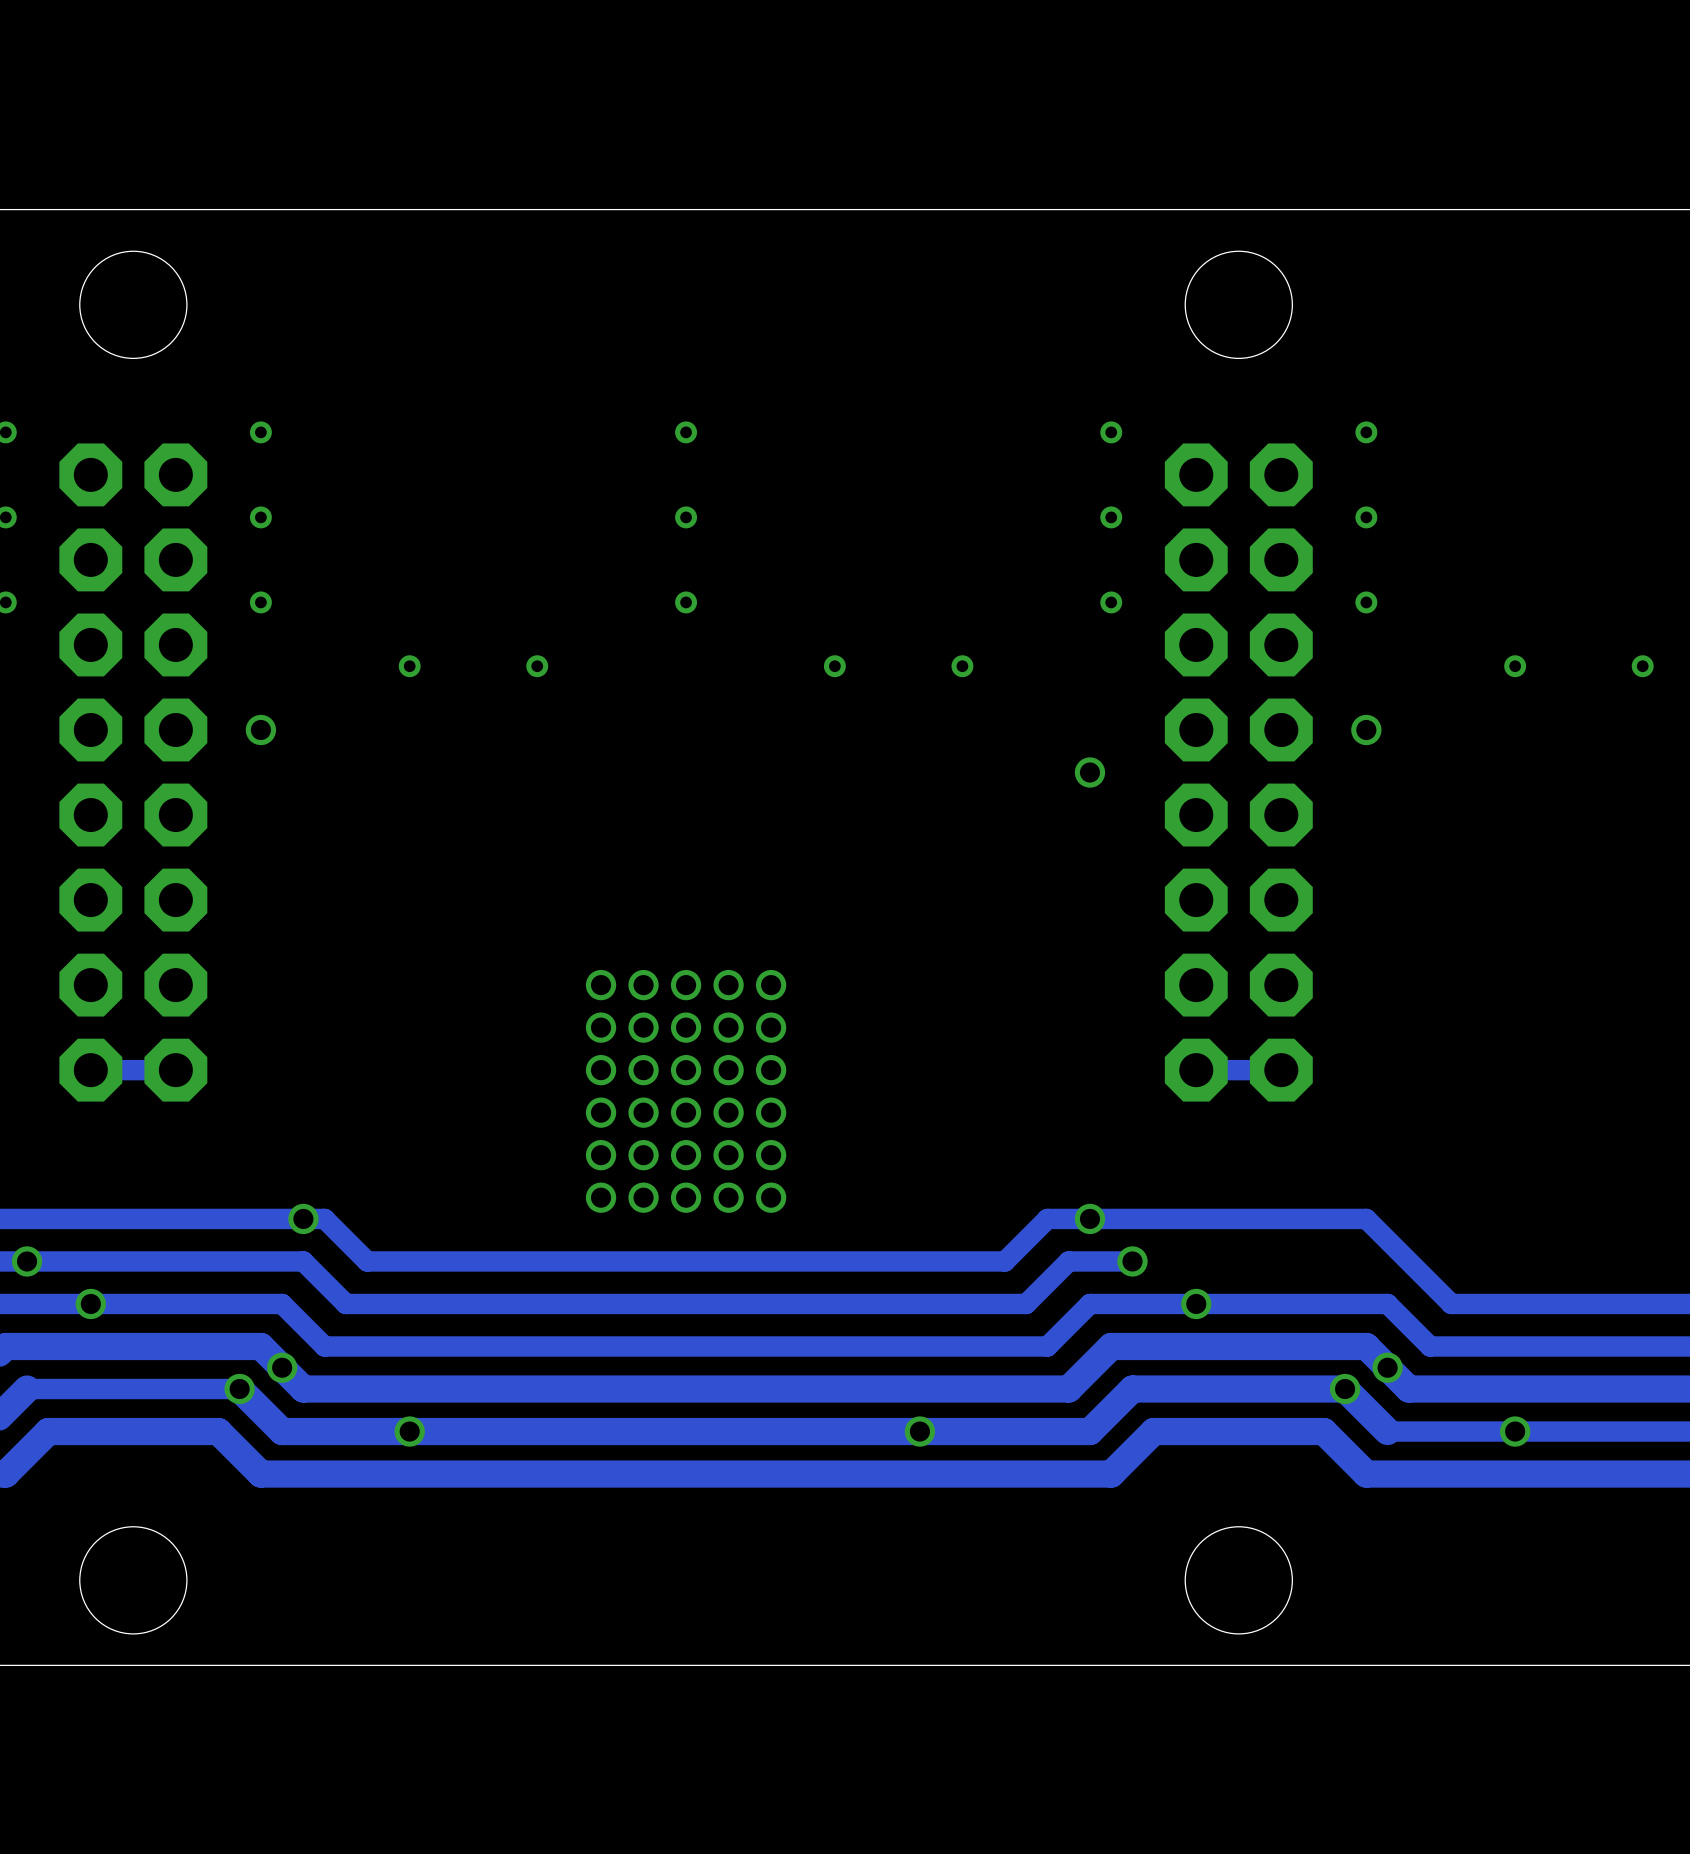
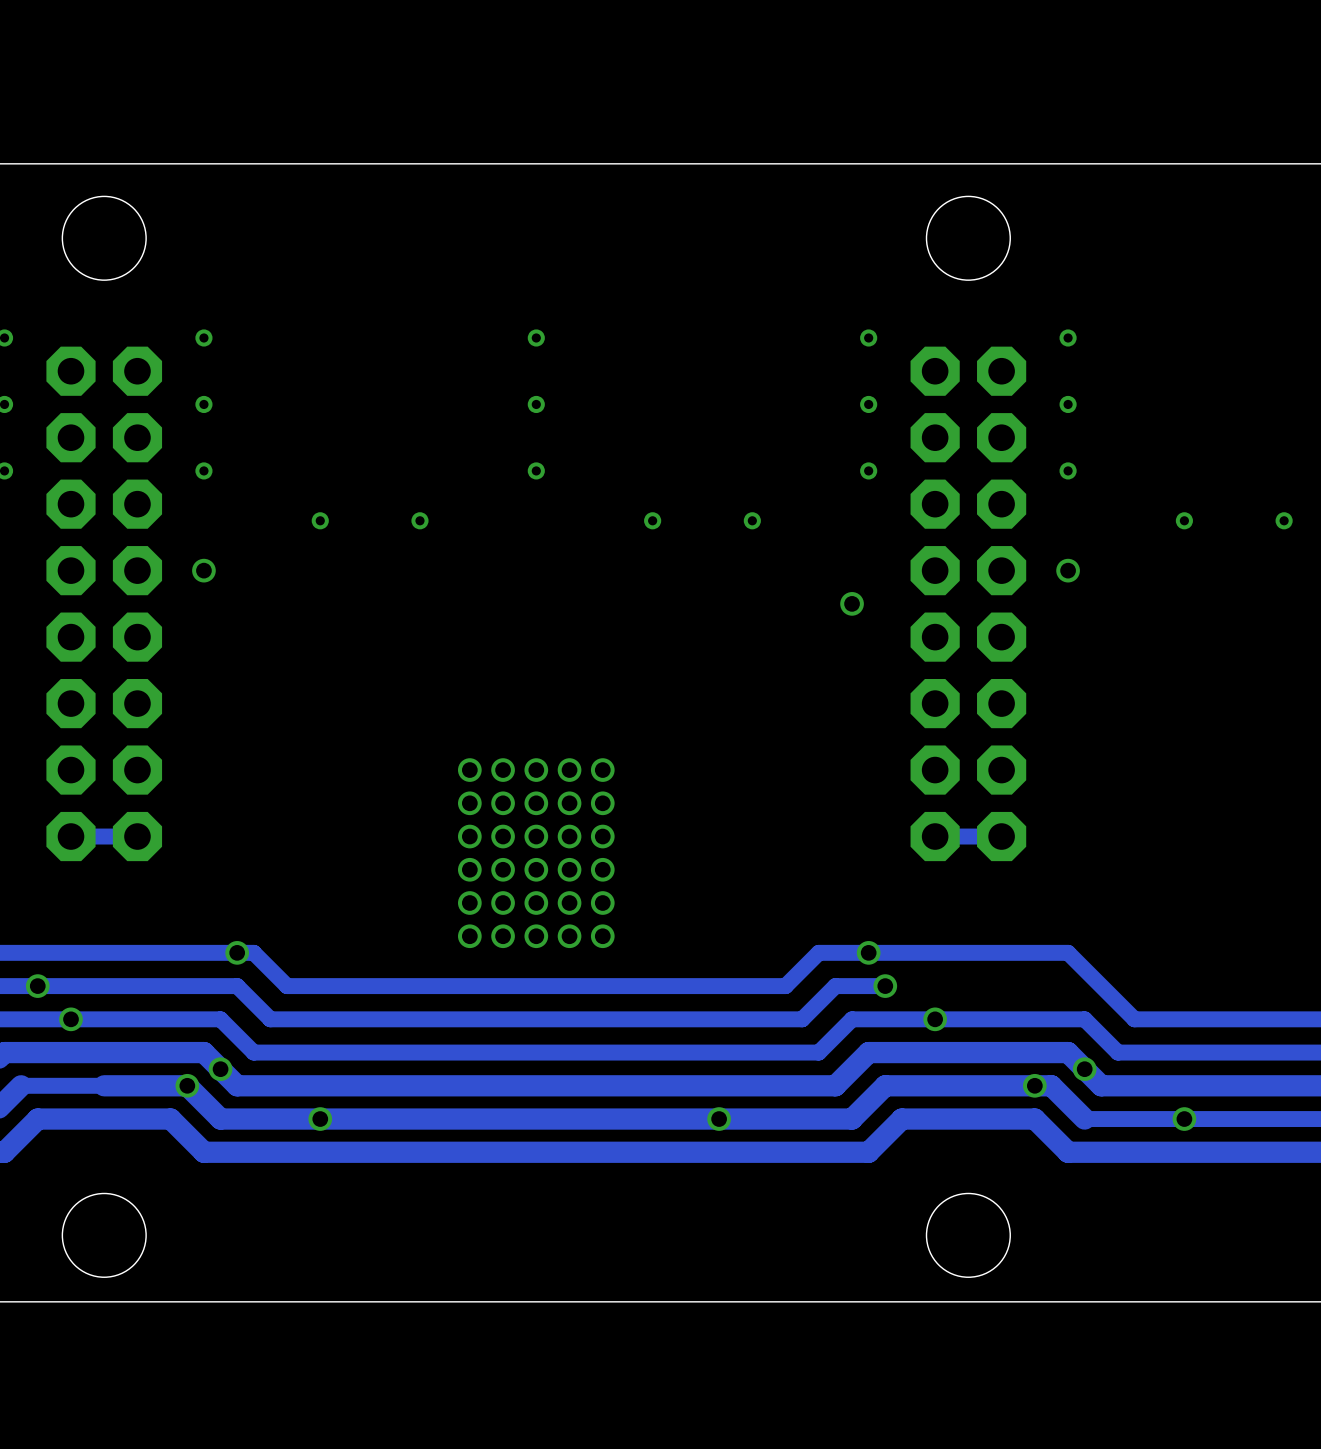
via position: (1089, 1218) -> (868, 952)
via position: (27, 1261) -> (37, 986)
track width: thin (239, 1389) (133, 1389) -> thick (187, 1085) (104, 1085)
via position: (1345, 1389) -> (1034, 1085)

